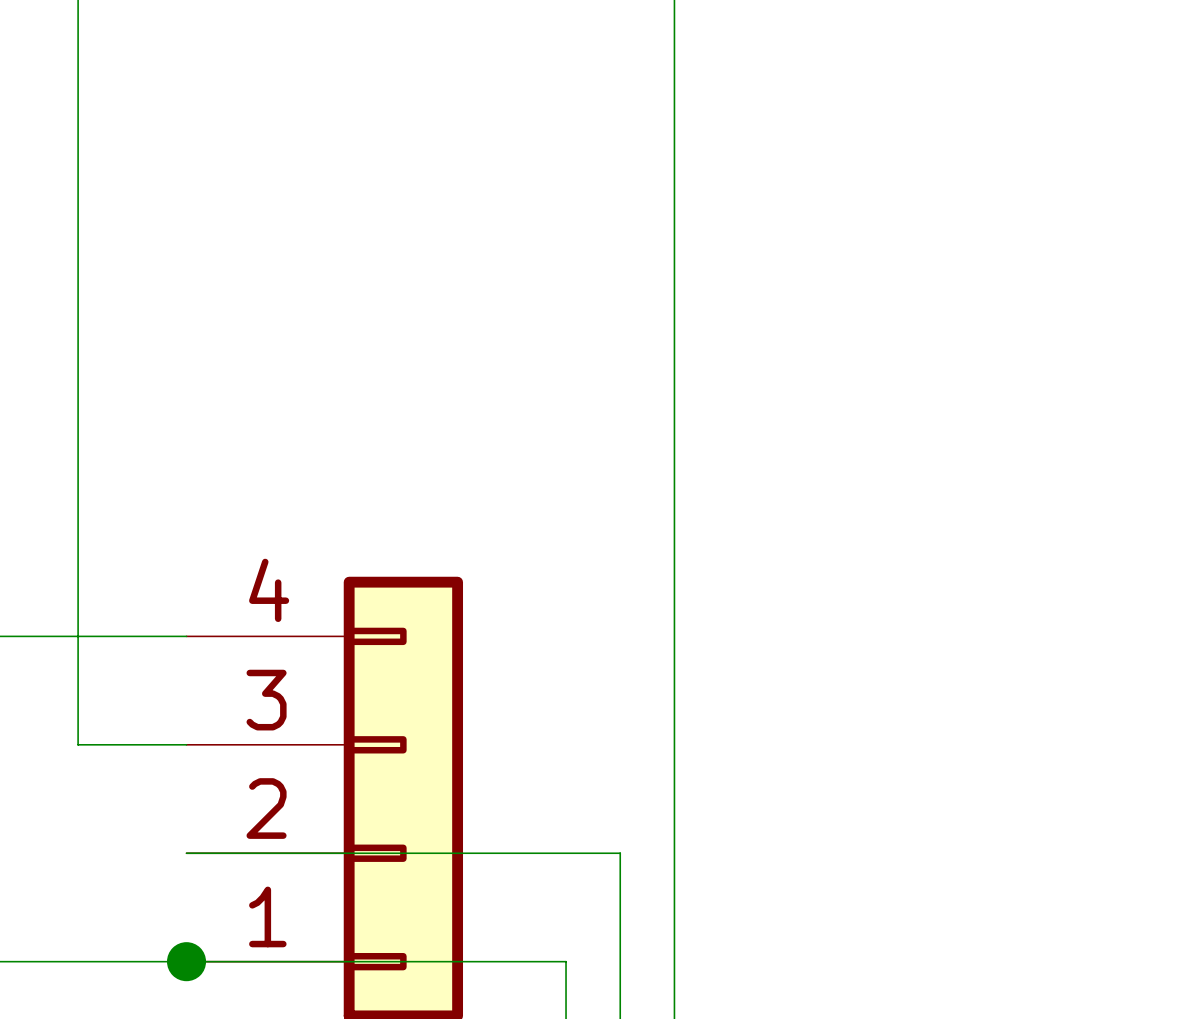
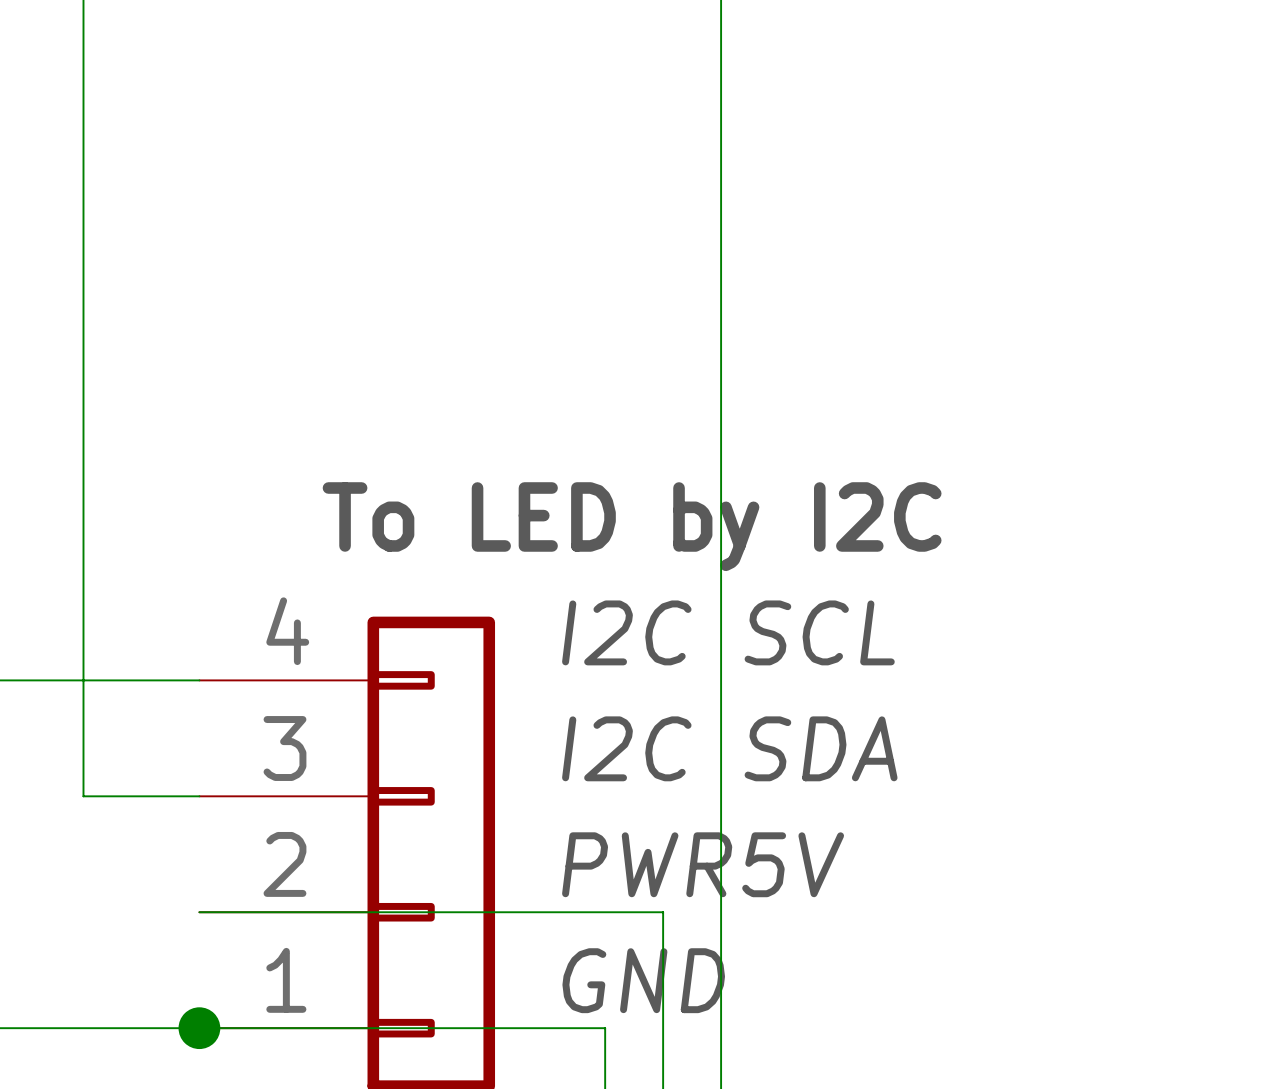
text: none -> To LED by I2C (632, 526)
text: none -> I2C SCL (728, 632)
text: none -> I2C SDA (729, 748)
text: none -> PWR5V (703, 864)
text: none -> GND (643, 980)

